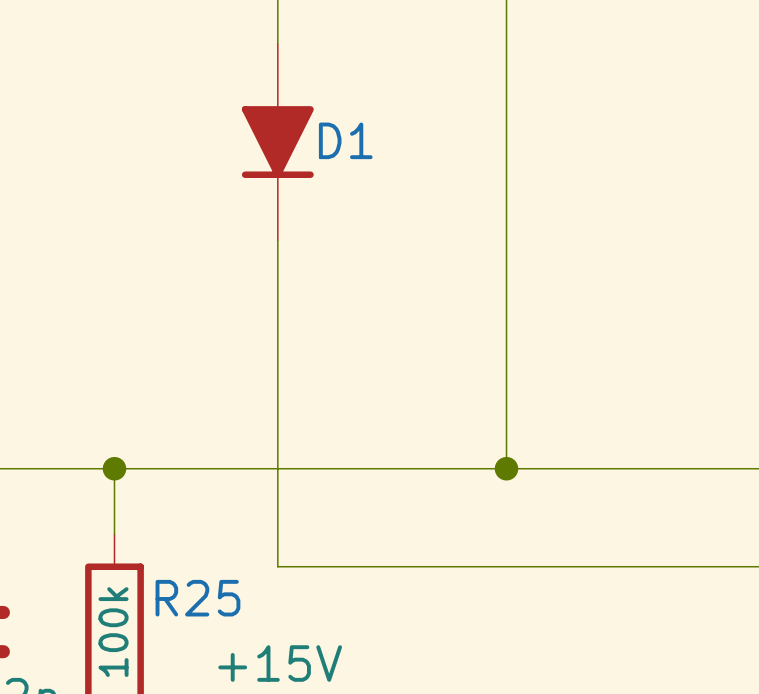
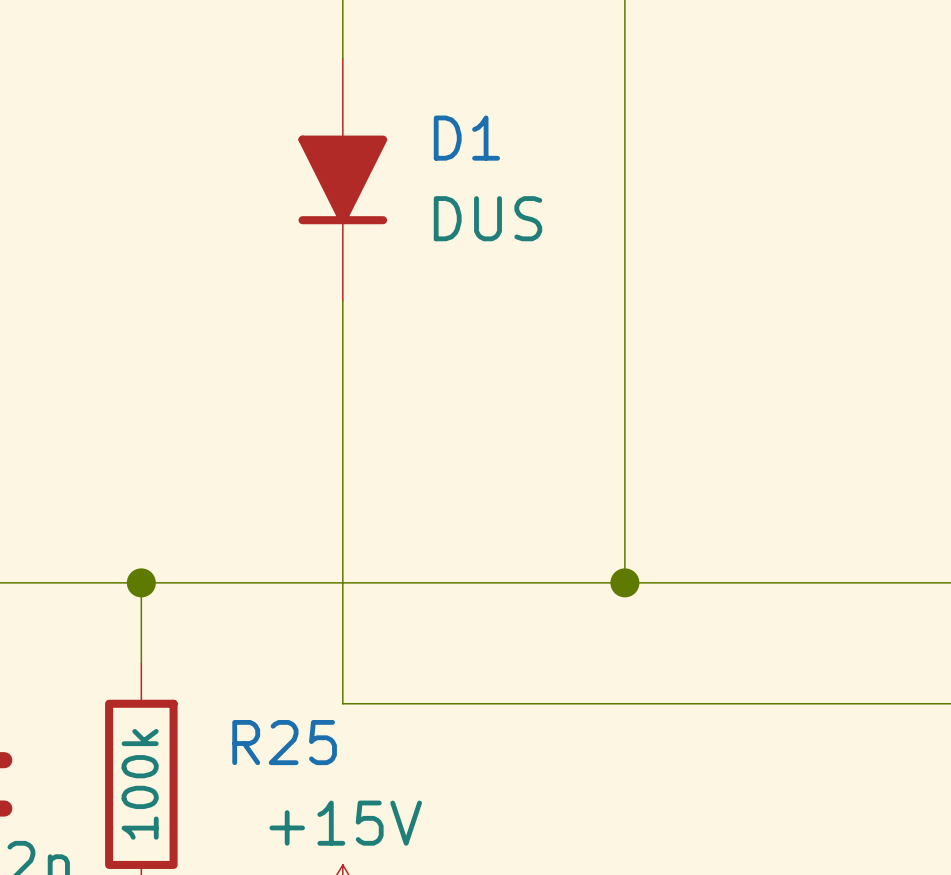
D1 name position: D1 (345, 140) -> D1 (466, 138)
D1 value: none -> DUS (487, 218)
R25 name position: R25 (197, 598) -> R25 (284, 742)

